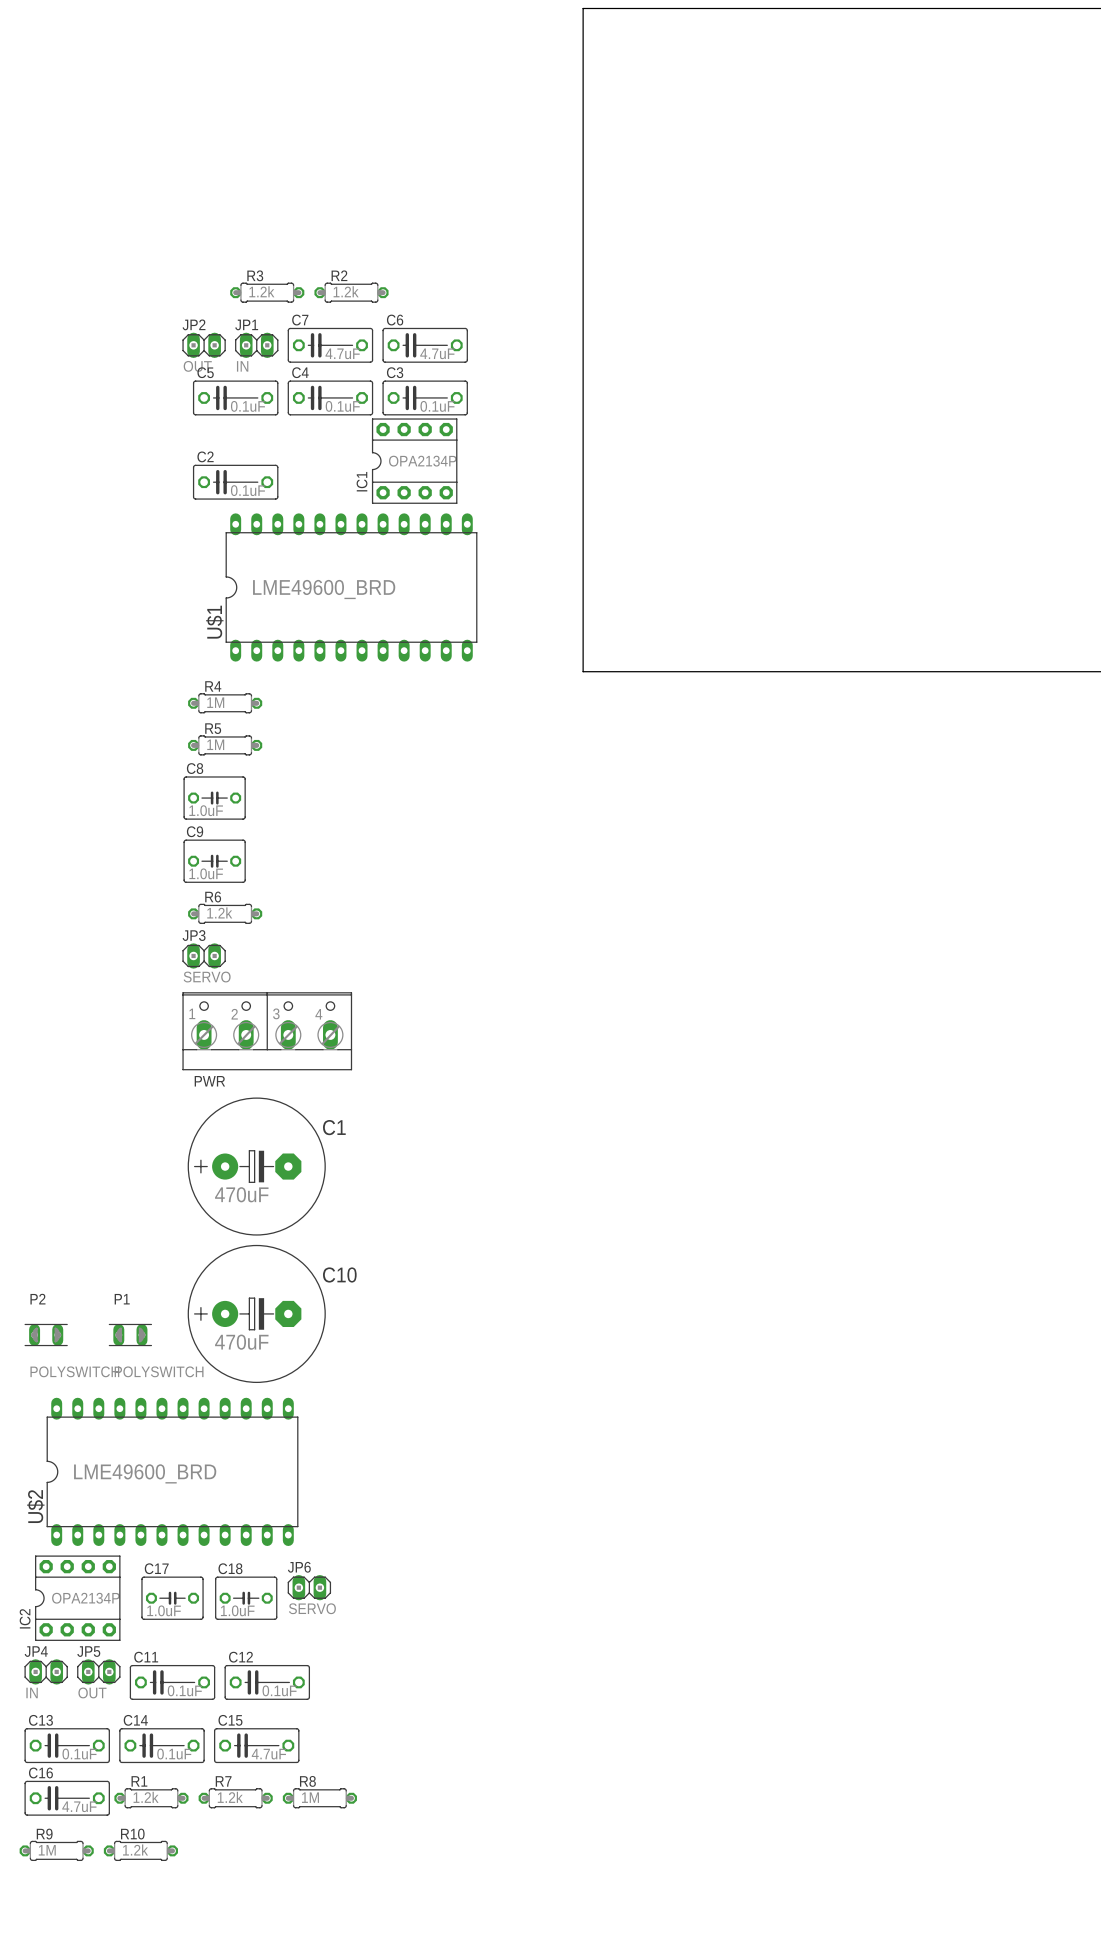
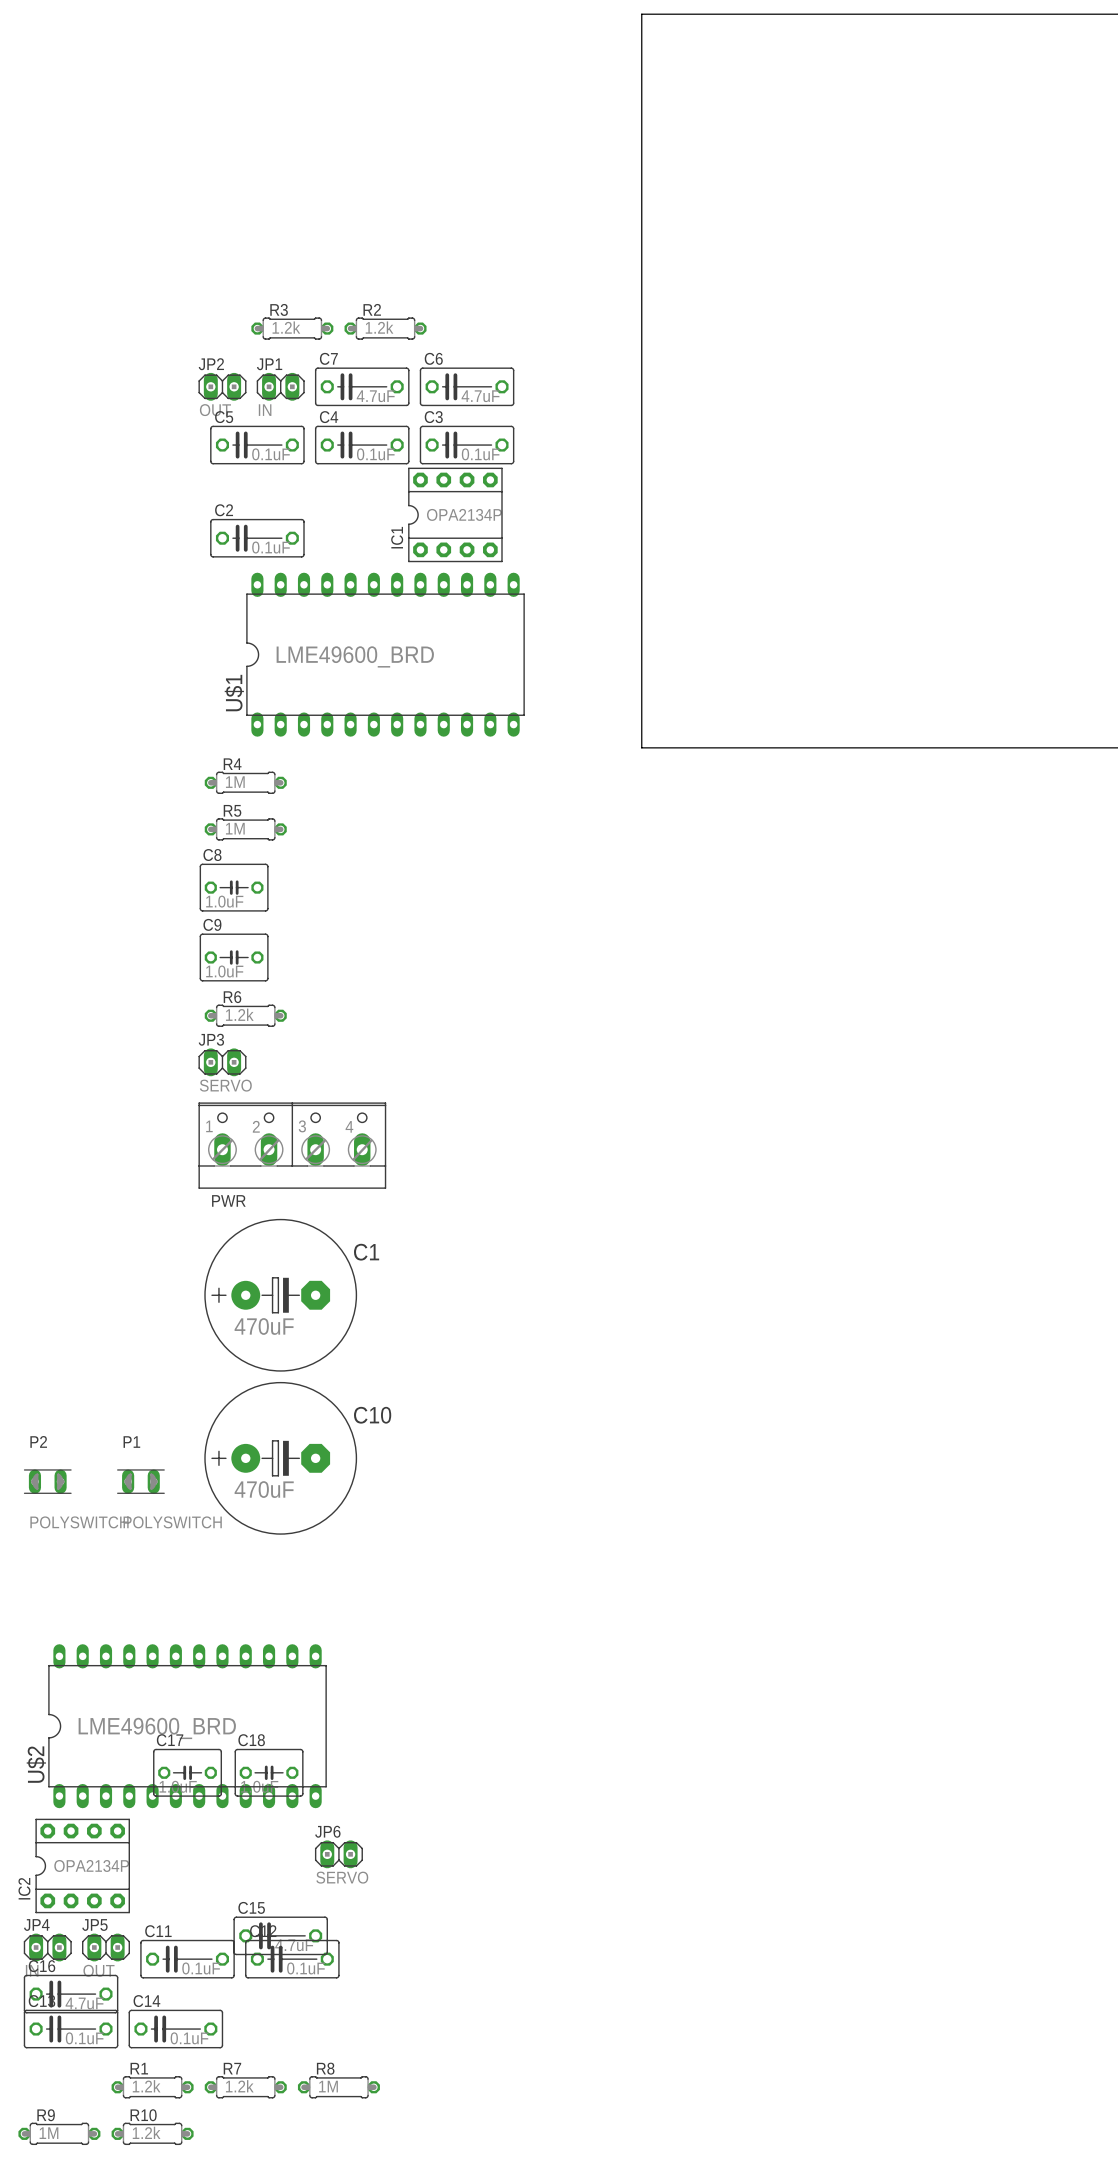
U$2 position: (172, 1471) -> (187, 1726)
JP6 position: (309, 1587) -> (338, 1854)
IC2 position: (77, 1598) -> (82, 1865)
JP4 position: (46, 1671) -> (47, 1947)
JP5 position: (98, 1671) -> (106, 1947)
C11 position: (172, 1682) -> (187, 1959)
C12 position: (267, 1682) -> (292, 1959)
C13 position: (67, 1745) -> (71, 2029)
C14 position: (161, 1745) -> (175, 2029)
R1 position: (151, 1798) -> (152, 2087)
R7 position: (235, 1798) -> (245, 2087)
R8 position: (319, 1798) -> (338, 2087)
R9 position: (56, 1850) -> (59, 2133)
R10 position: (140, 1850) -> (152, 2133)

